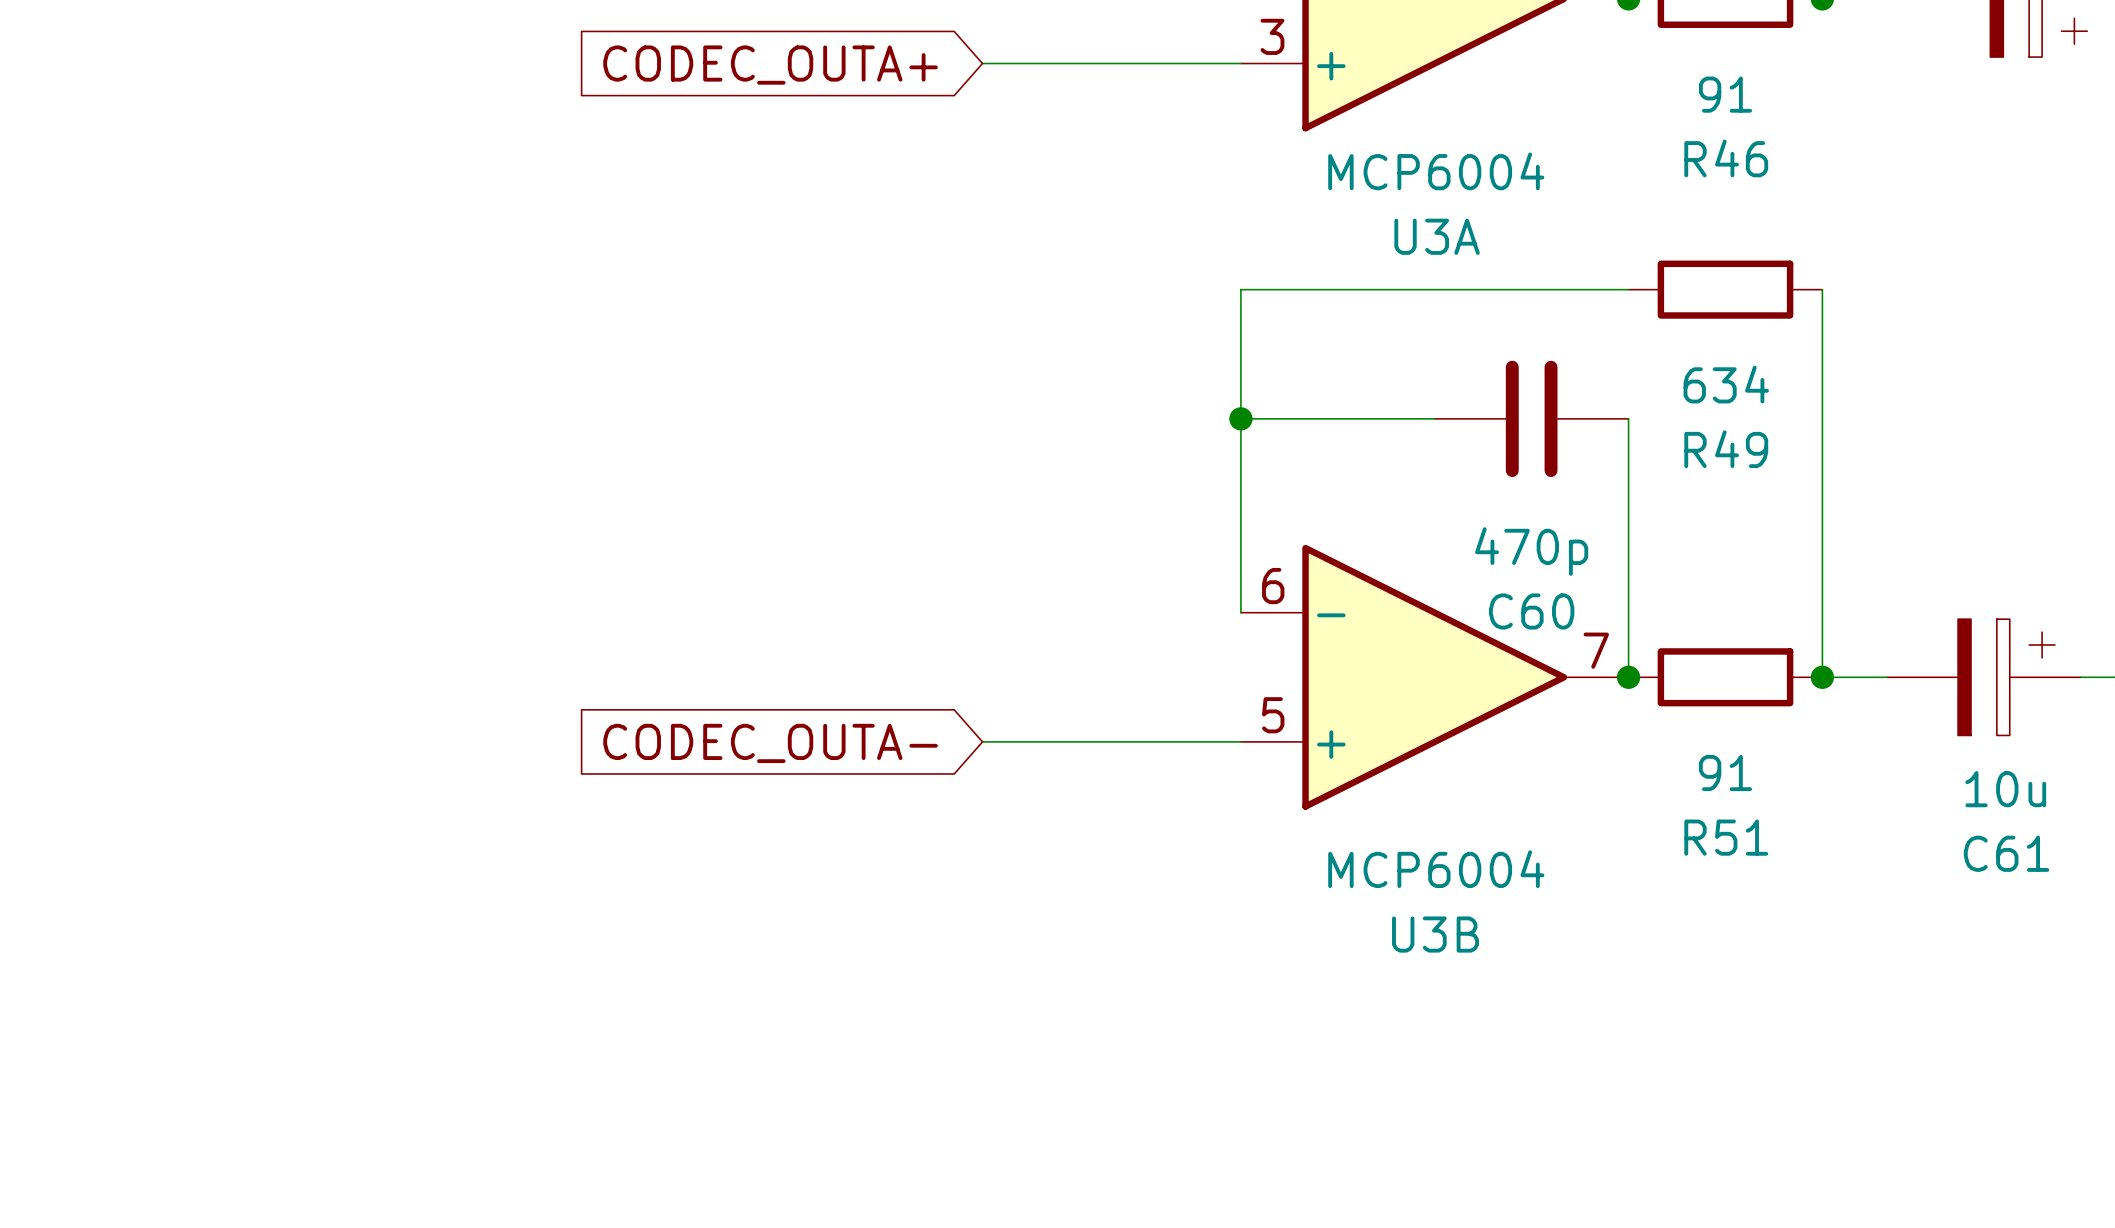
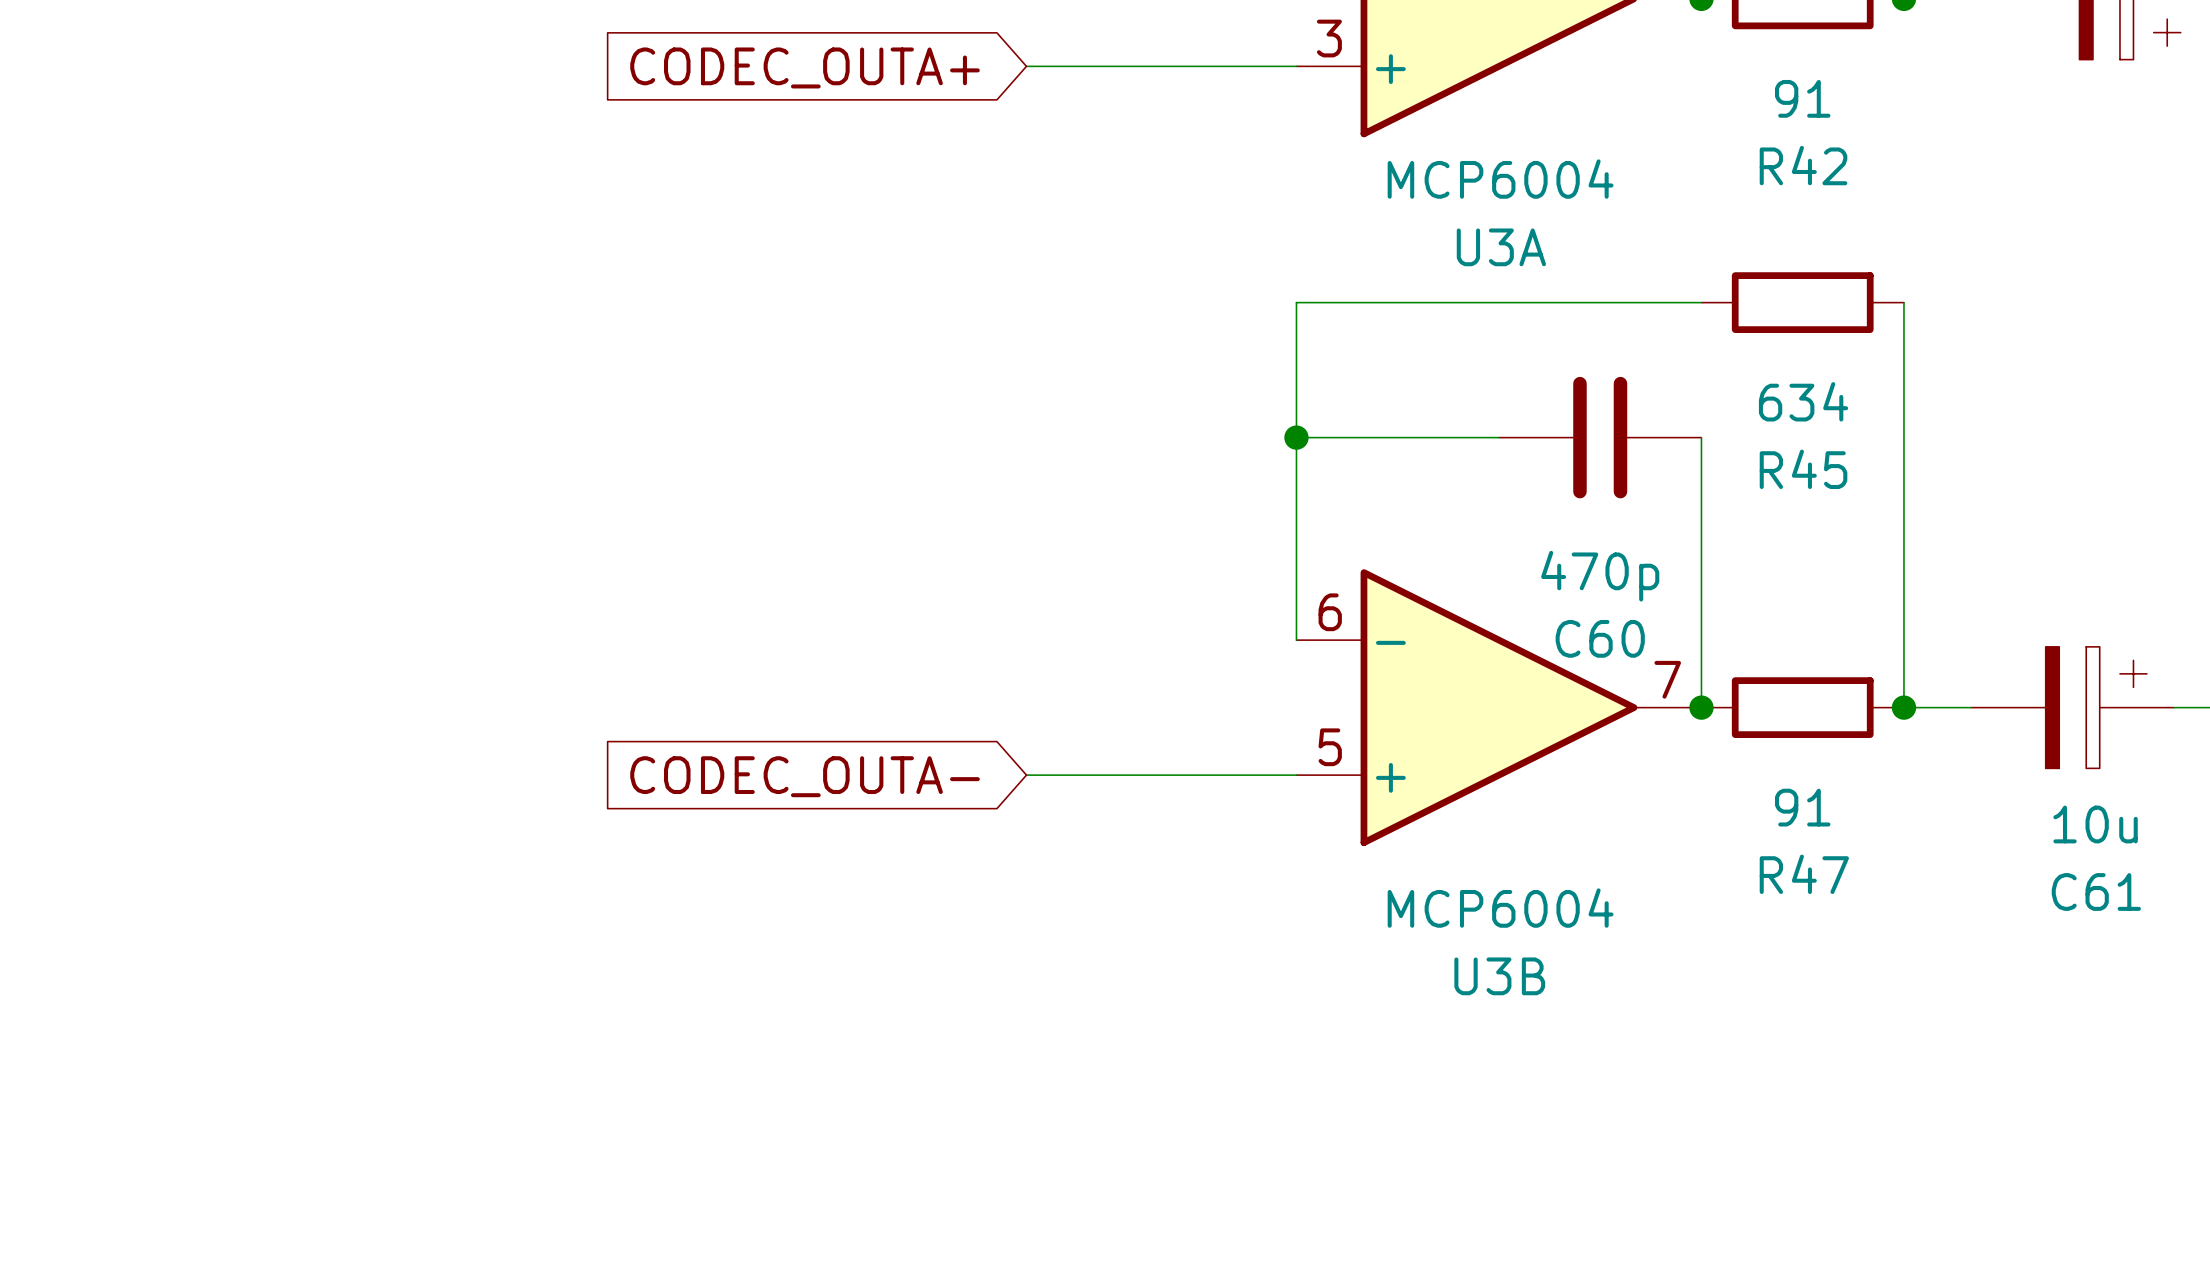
R46 name: R46 (1726, 158) -> R42 (1803, 165)
R49 name: R49 (1726, 449) -> R45 (1803, 469)
R51 name: R51 (1726, 837) -> R47 (1804, 874)

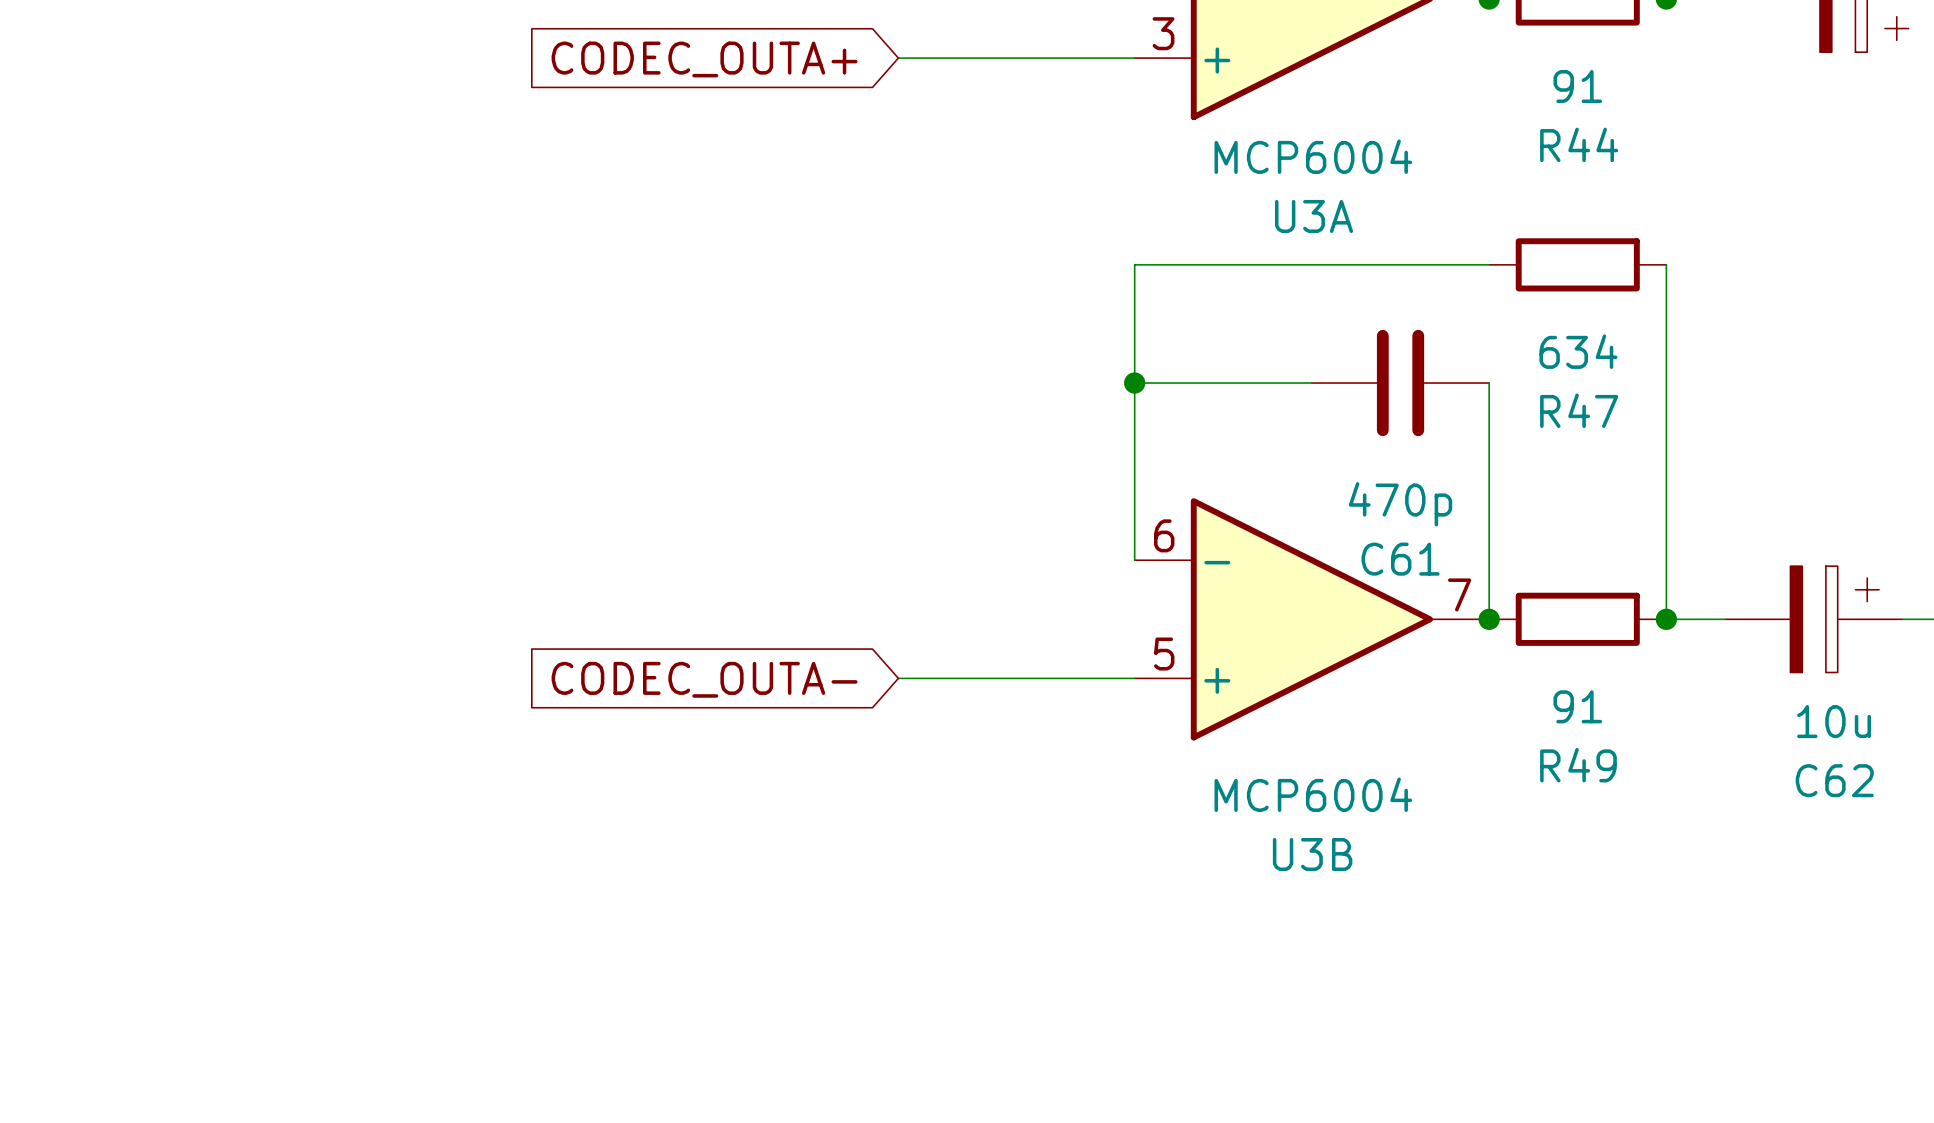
R42 name: R42 (1803, 165) -> R44 (1579, 144)
R45 name: R45 (1803, 469) -> R47 (1579, 410)
C60 name: C60 (1600, 638) -> C61 (1400, 559)
R47 name: R47 (1804, 874) -> R49 (1578, 765)
C61 name: C61 (2096, 891) -> C62 (1834, 780)

